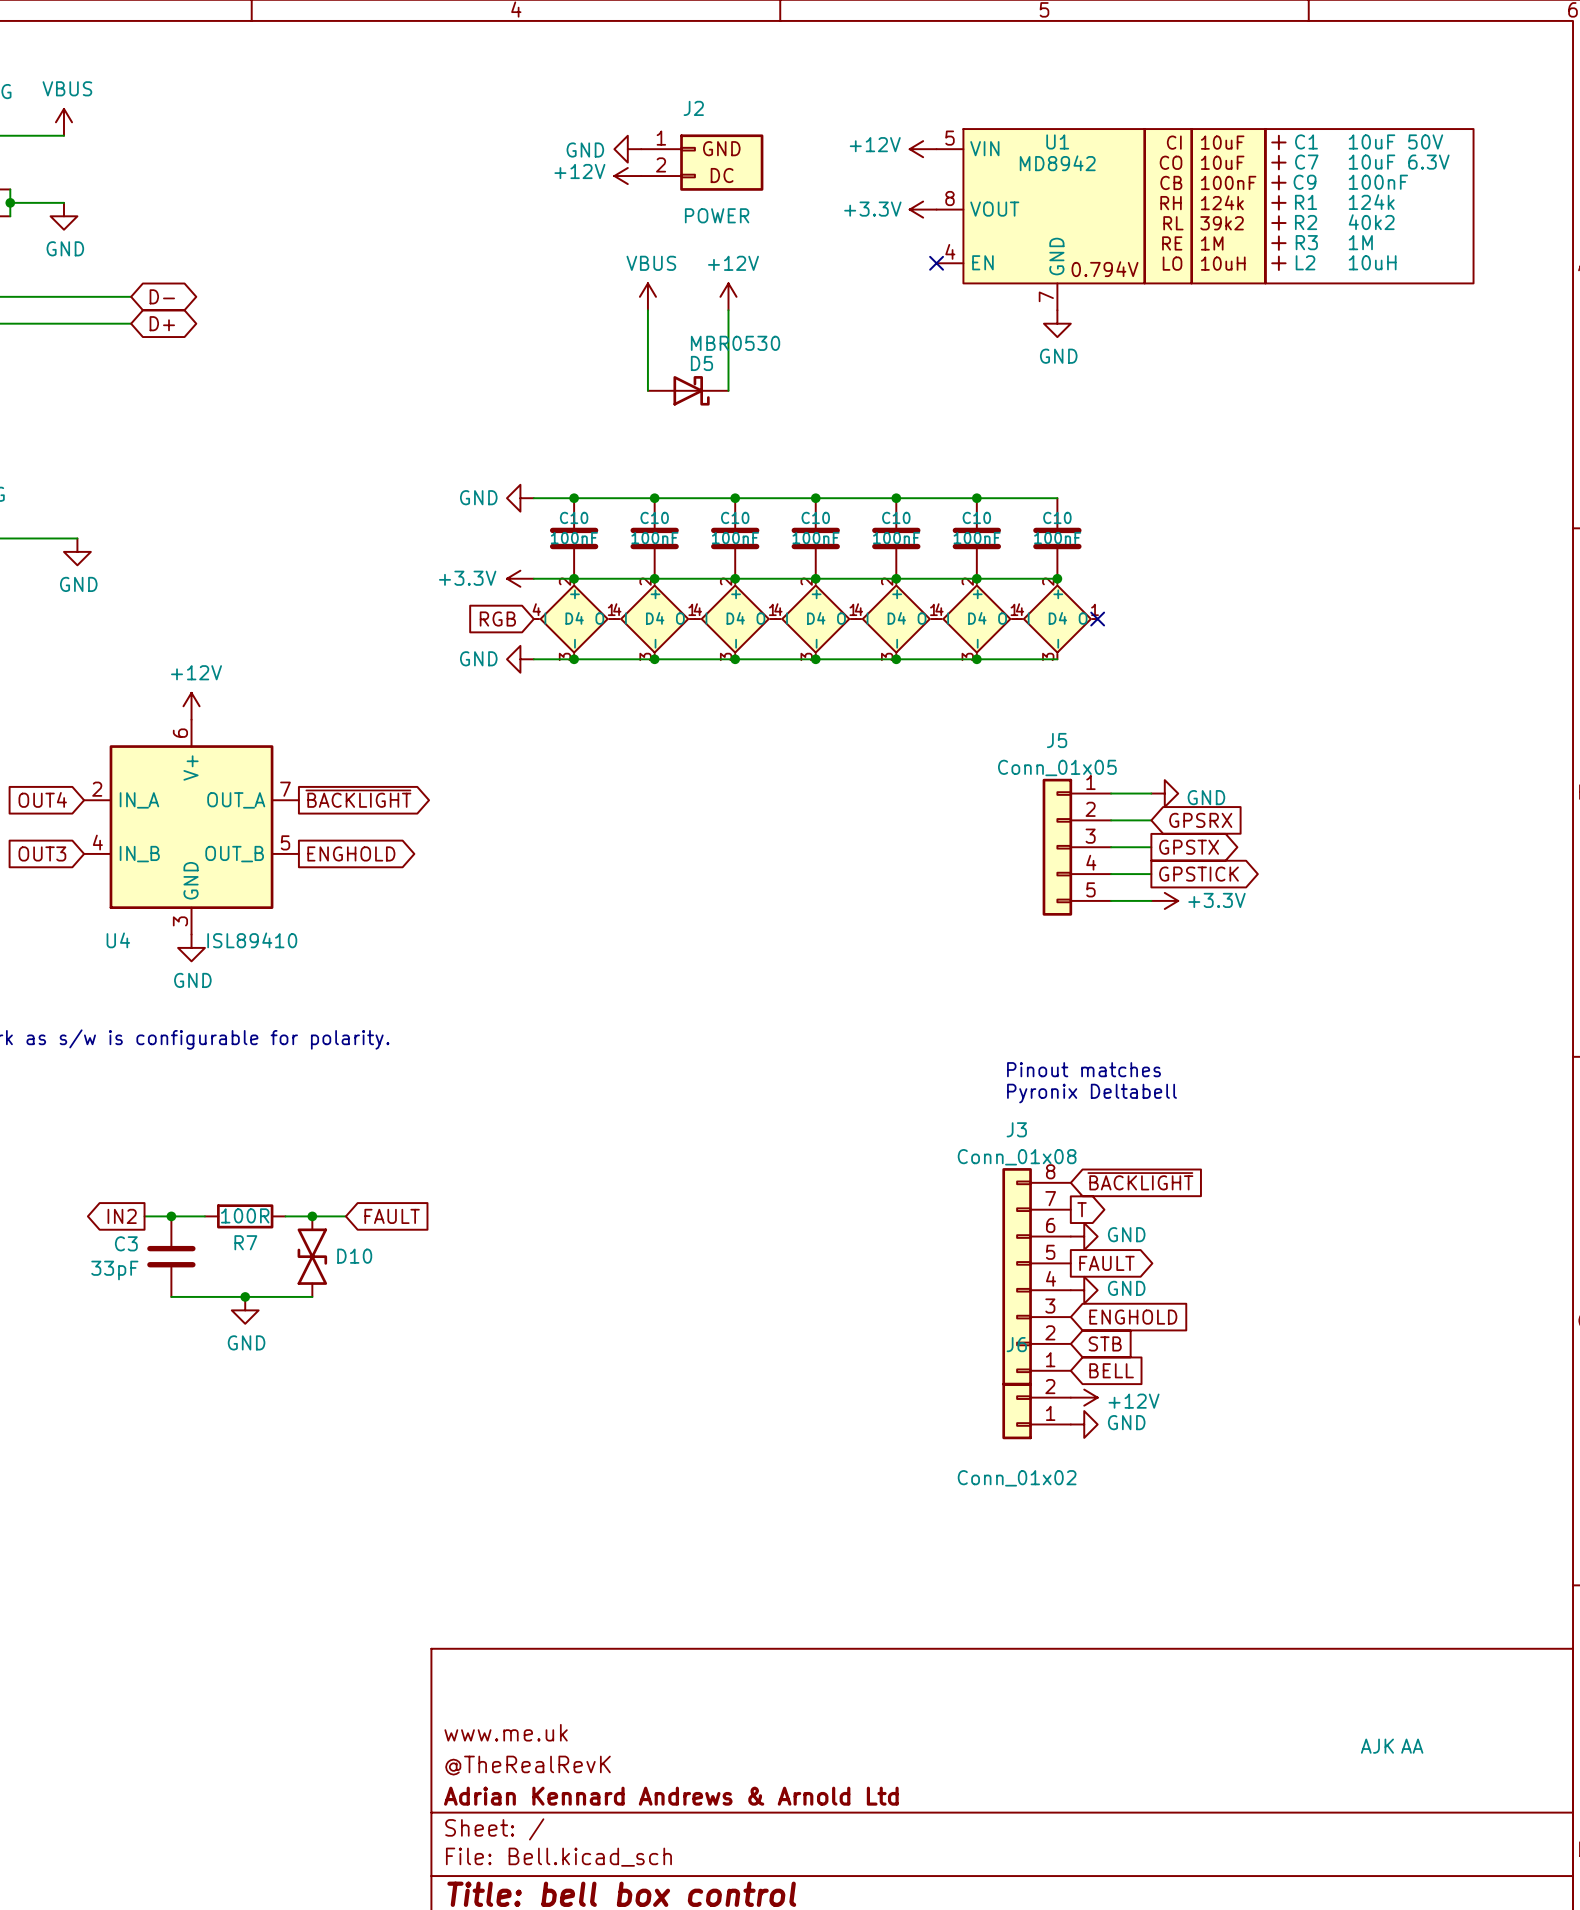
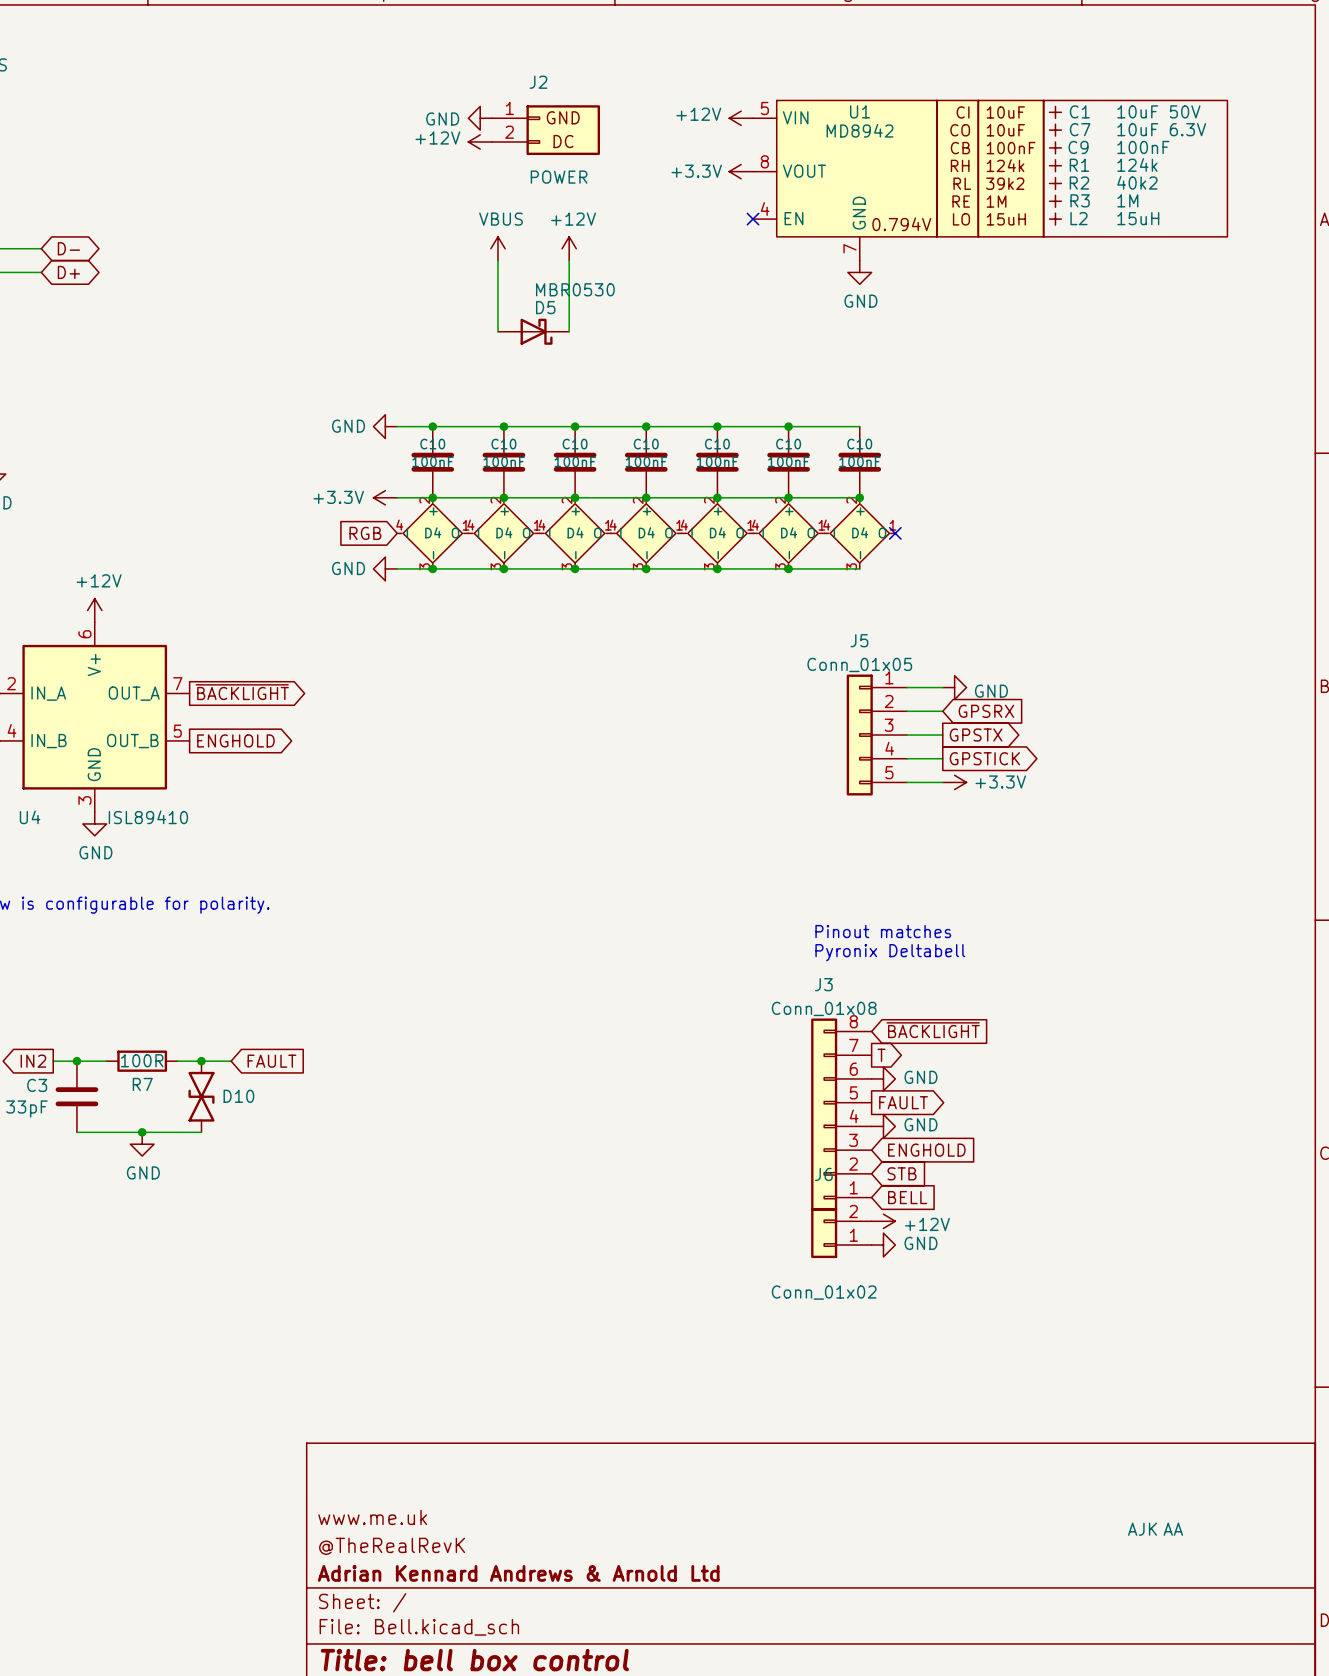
L2 value: 10uH (1372, 262) -> 15uH (1138, 218)
U1 text: 10uH (1223, 263) -> 15uH (1006, 219)

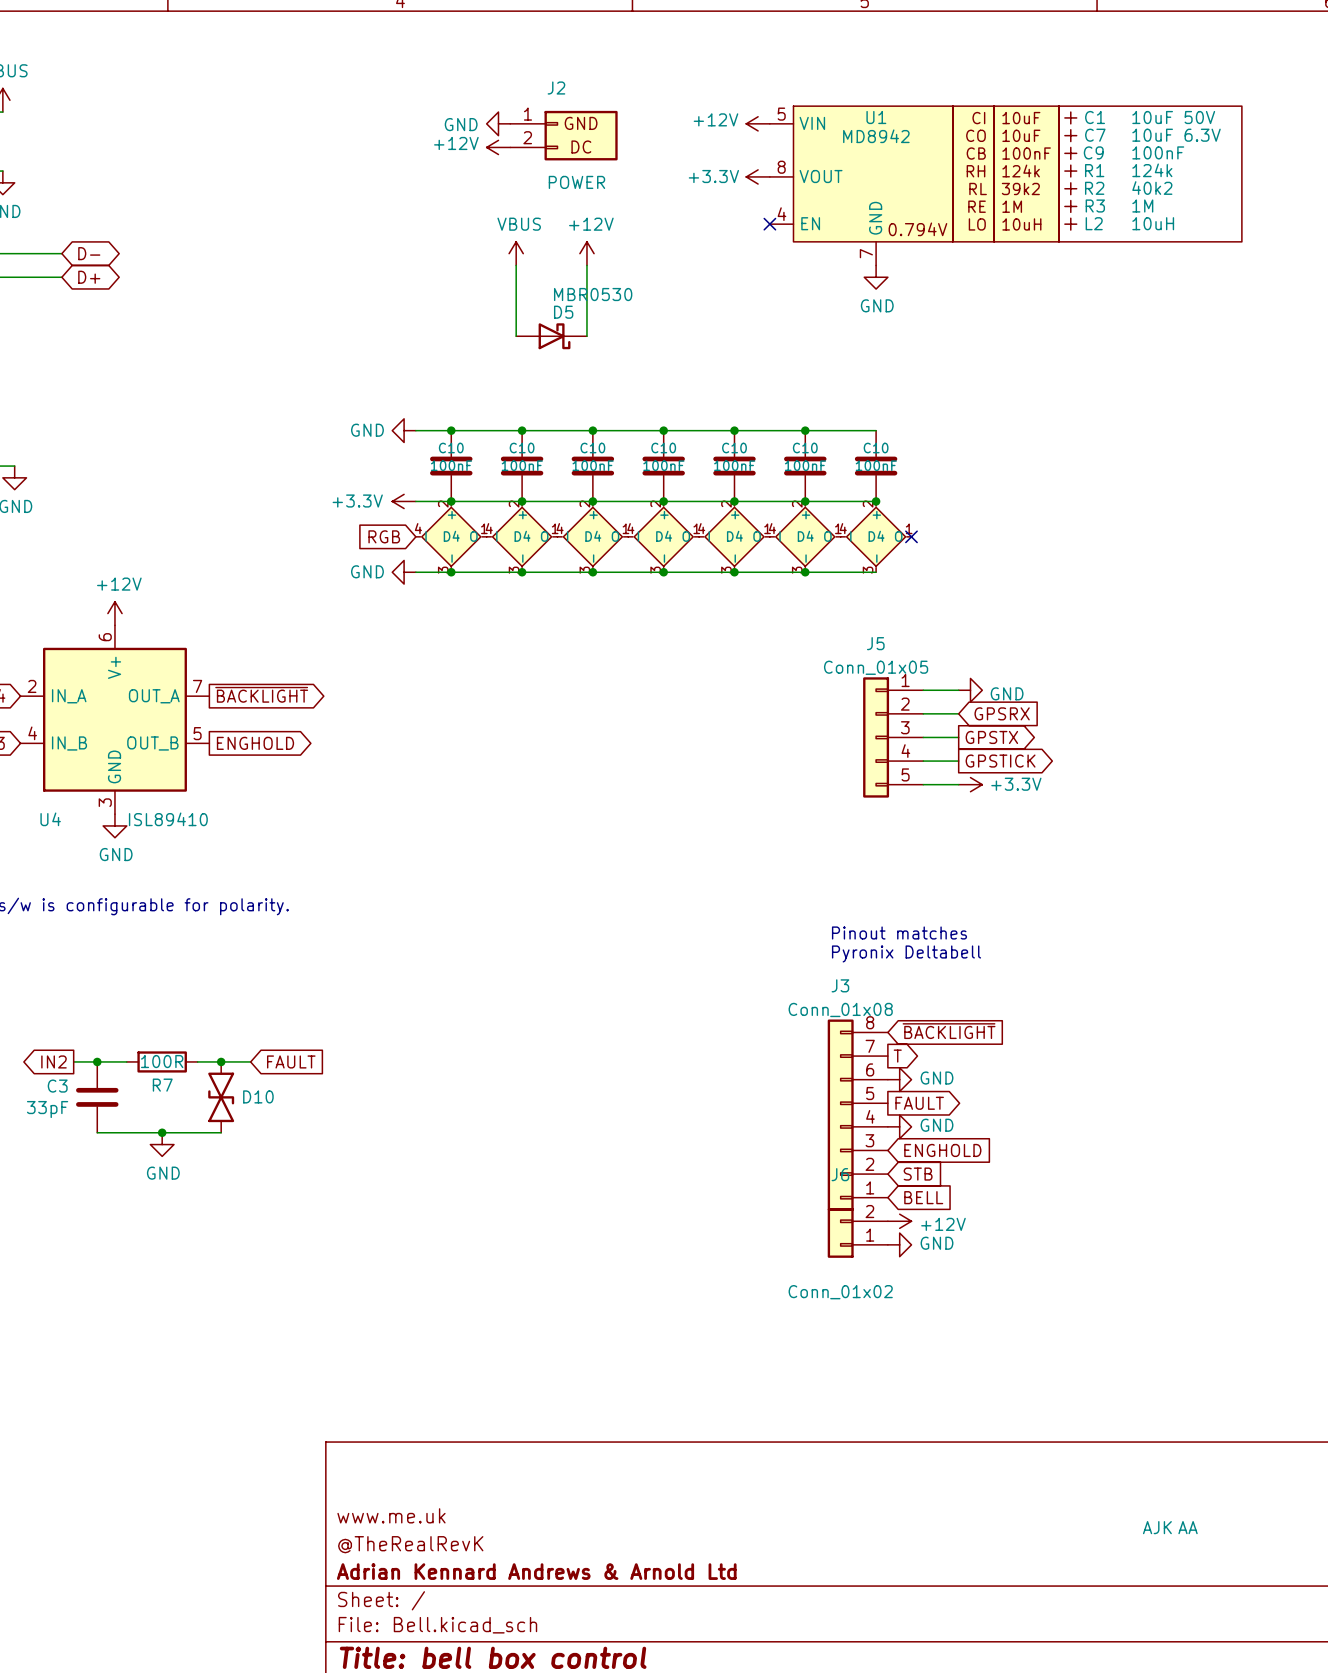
L2 value: 15uH (1138, 218) -> 10uH (1153, 223)
U1 text: 15uH (1006, 219) -> 10uH (1021, 224)

